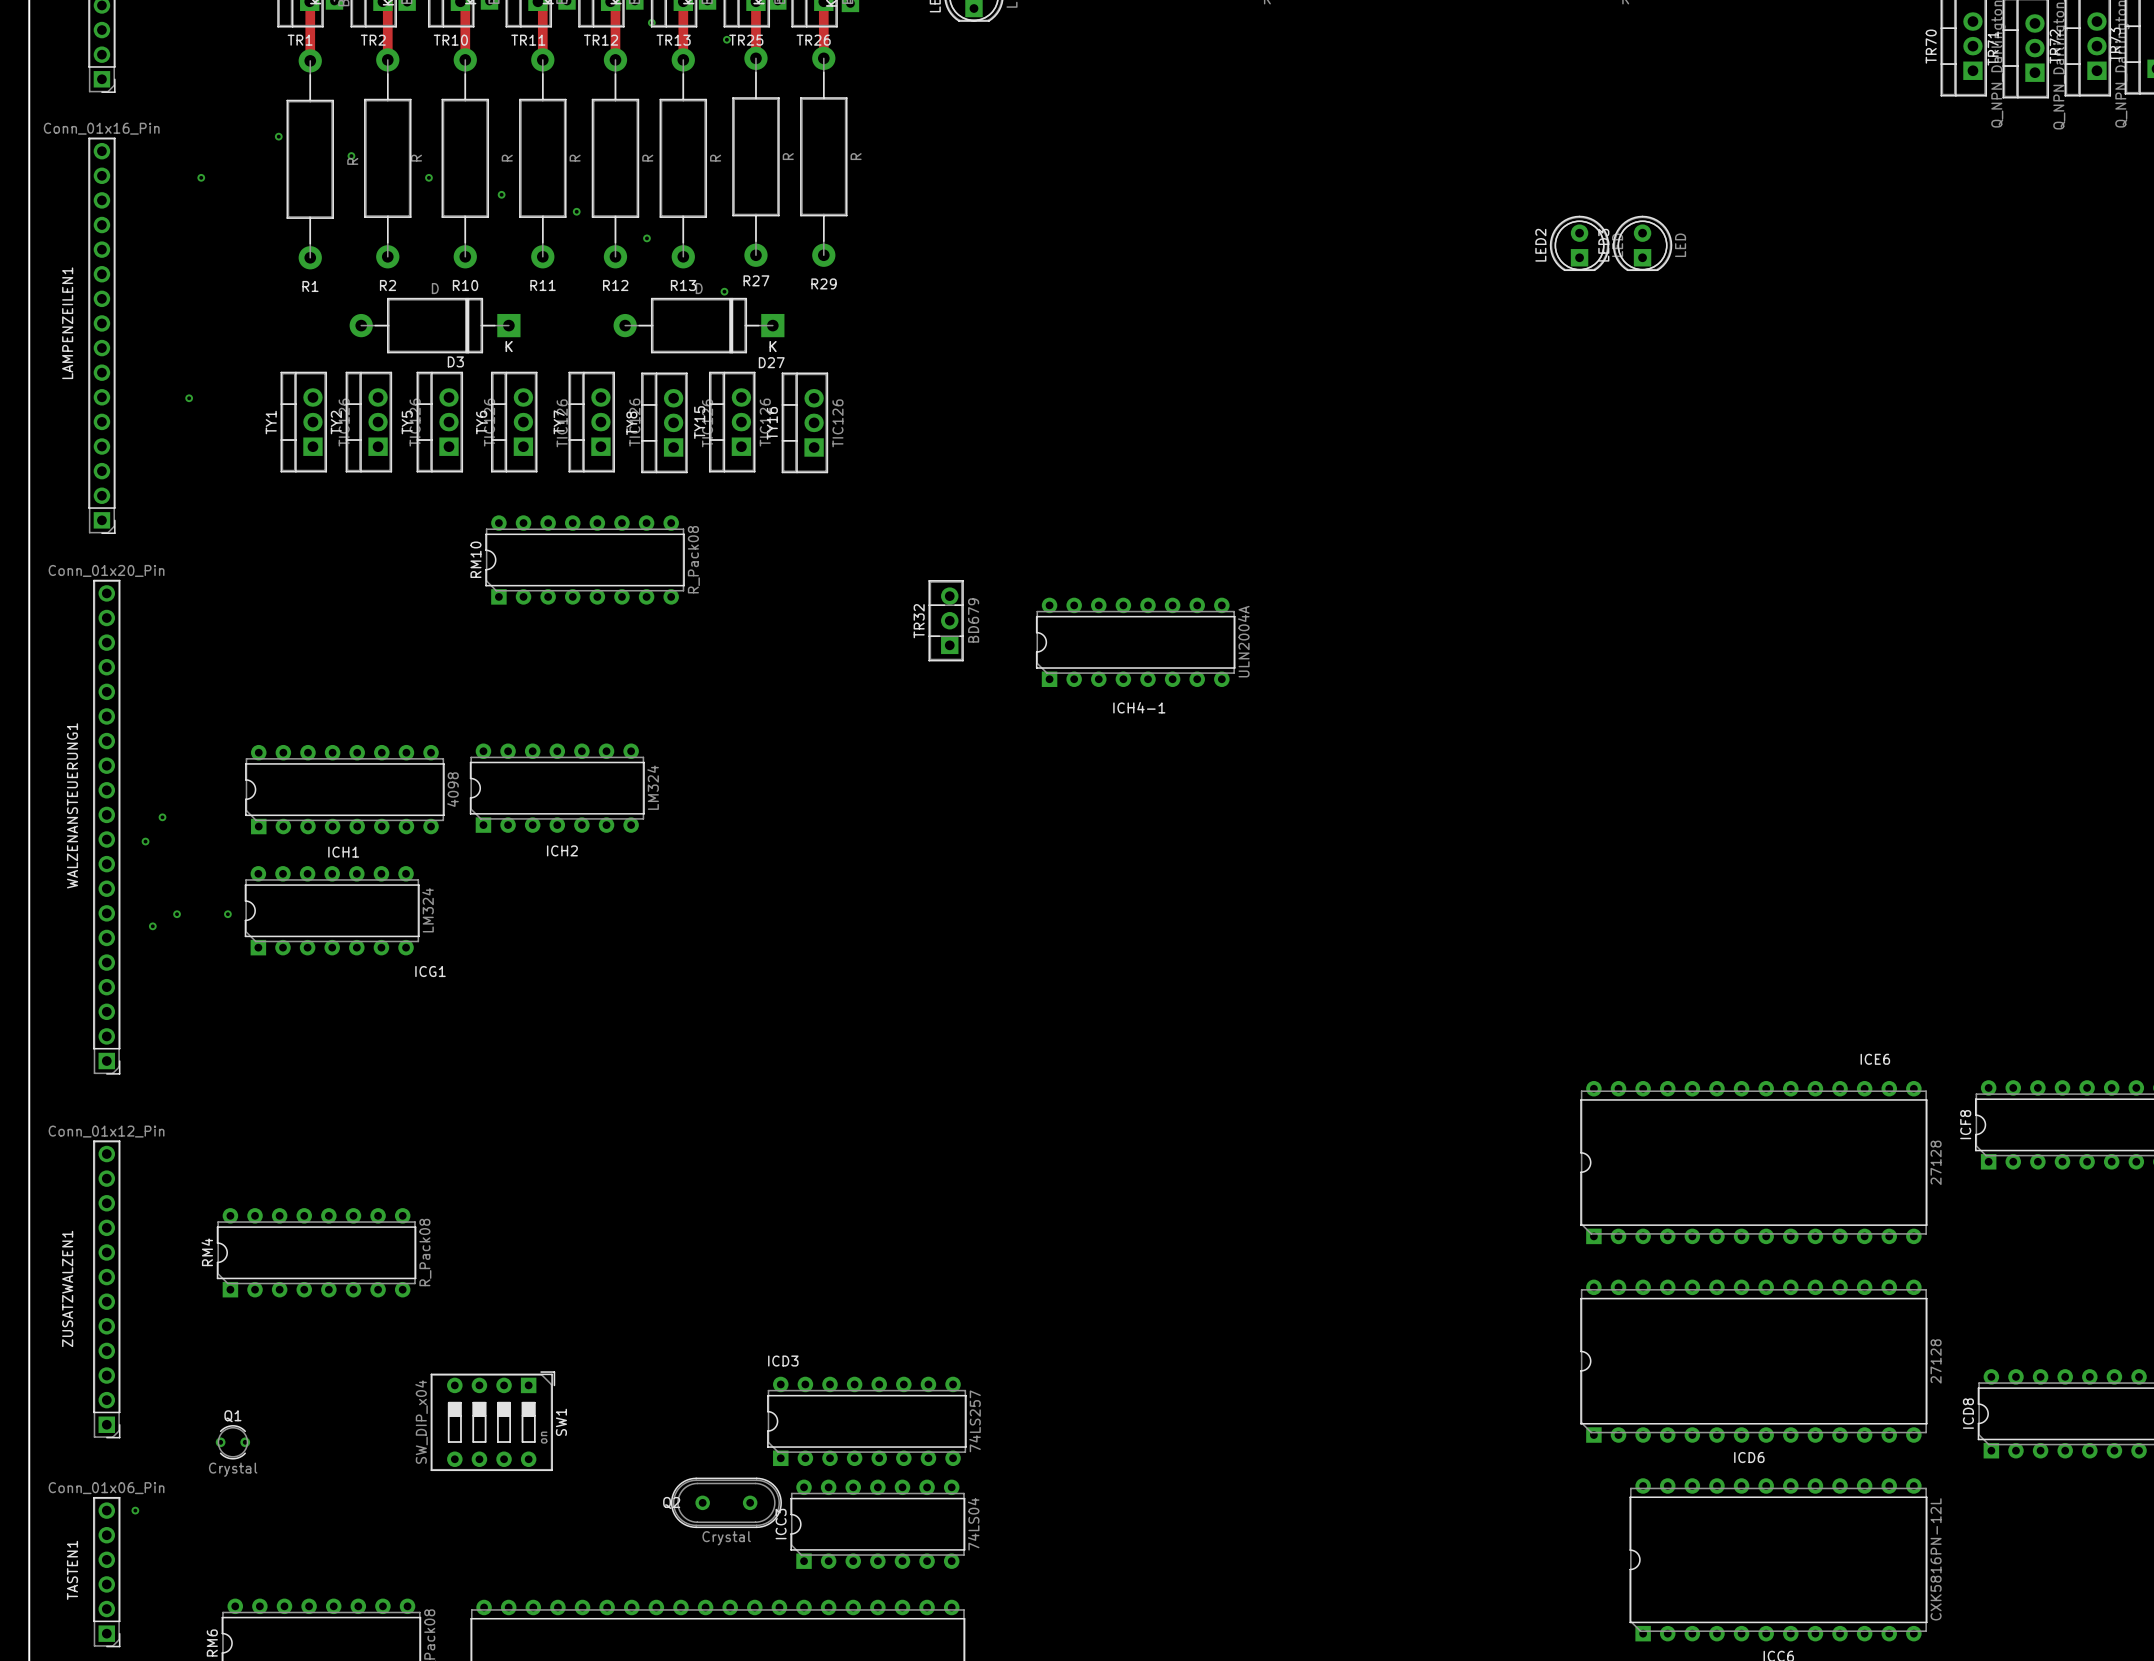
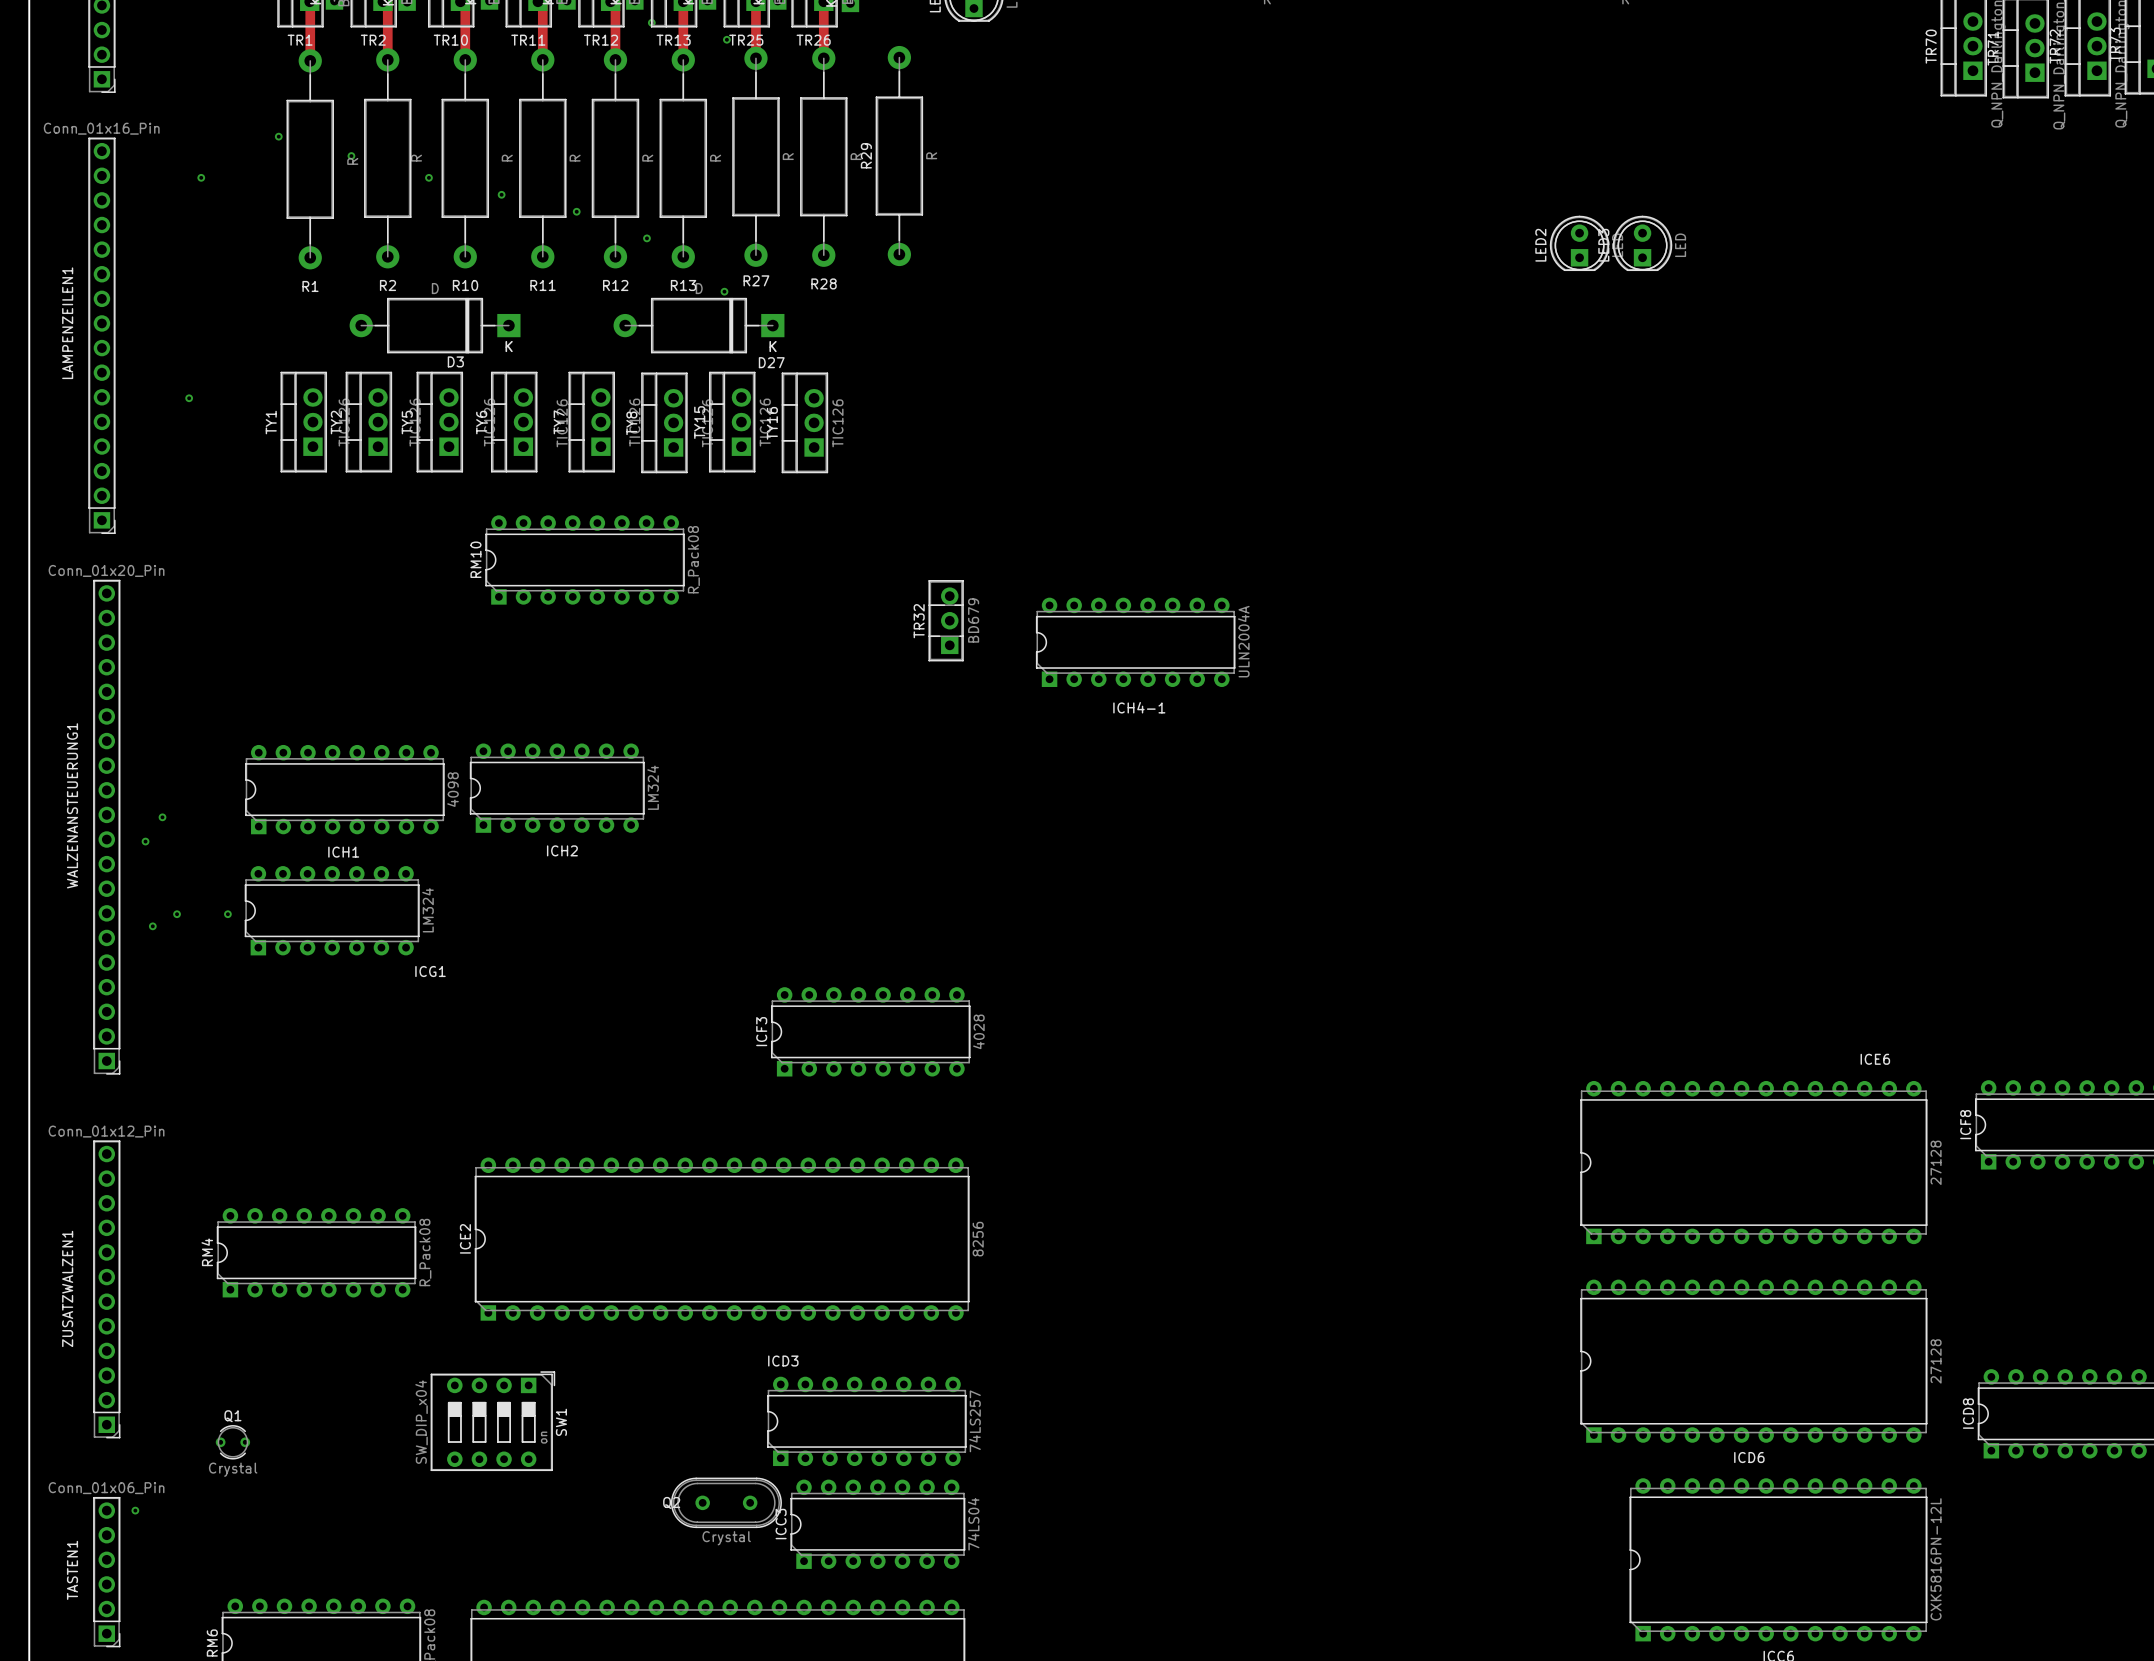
R29: none -> R (899, 156)
R29 name: R29 (824, 283) -> R28 (824, 283)
ICF3: none -> 4028 (870, 1031)
ICE2: none -> 8256 (722, 1239)

